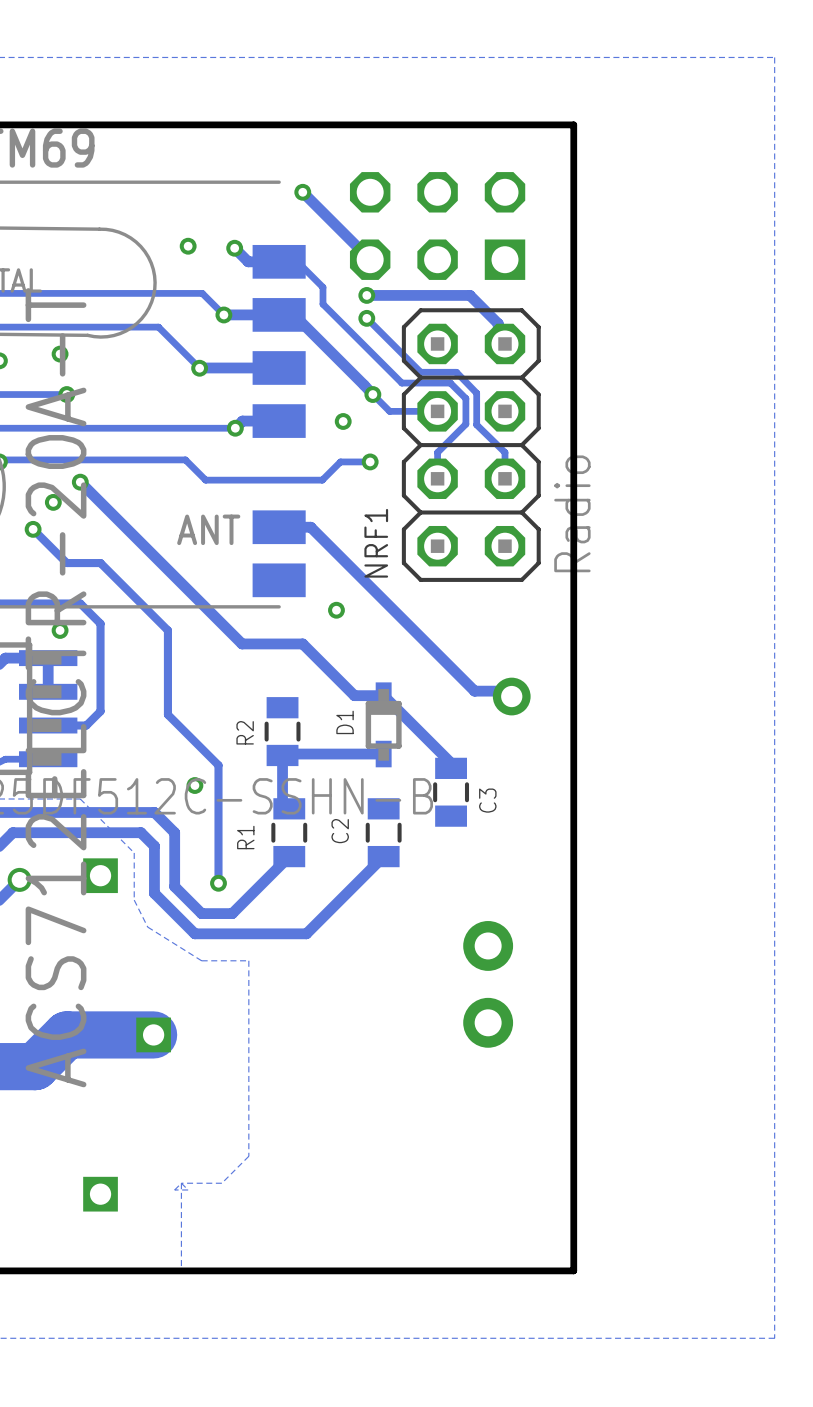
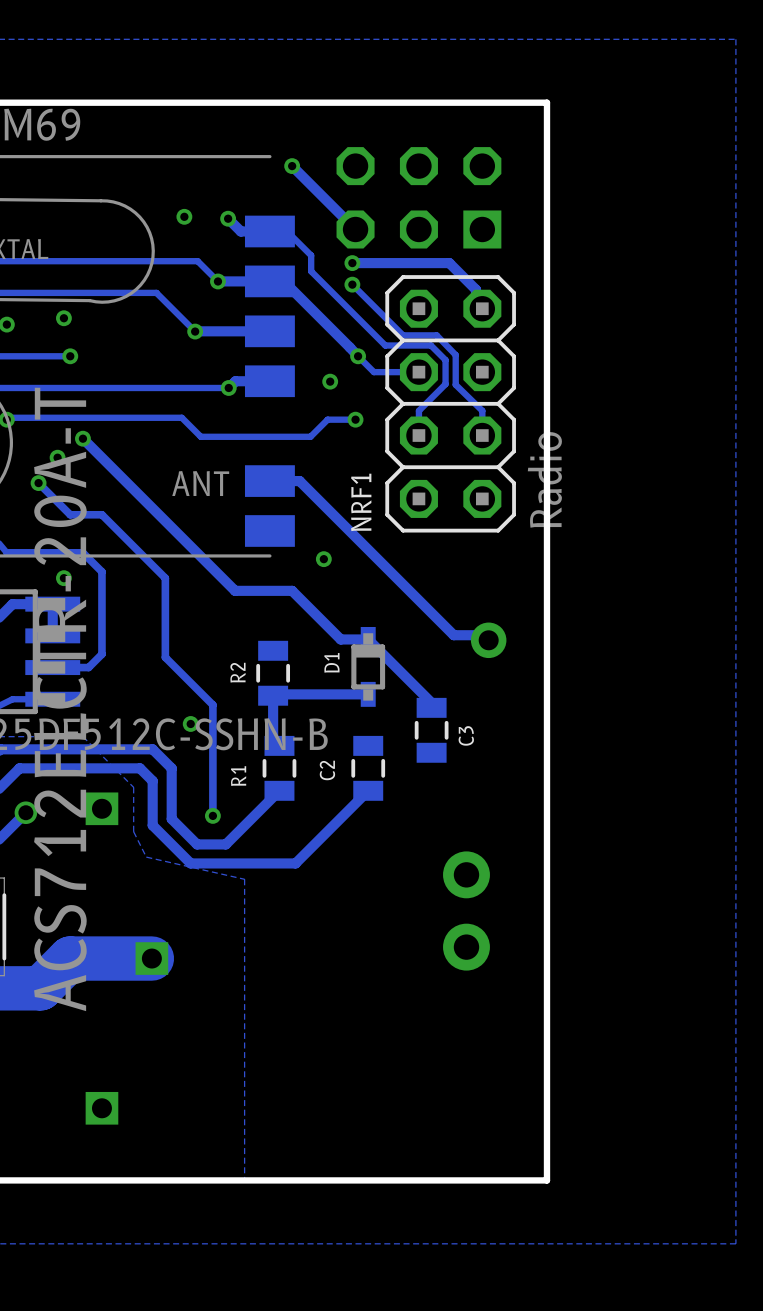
zone outline: (147, 927) (201, 960) (248, 960) (248, 1156) (221, 1183) (181, 1183) -> (146, 857) (244, 879) (244, 1180) (178, 1180)
zone outline: (181, 1183) (188, 1189) (174, 1189) (181, 1183) -> none
zone outline: (181, 1183) (181, 1270) -> none

